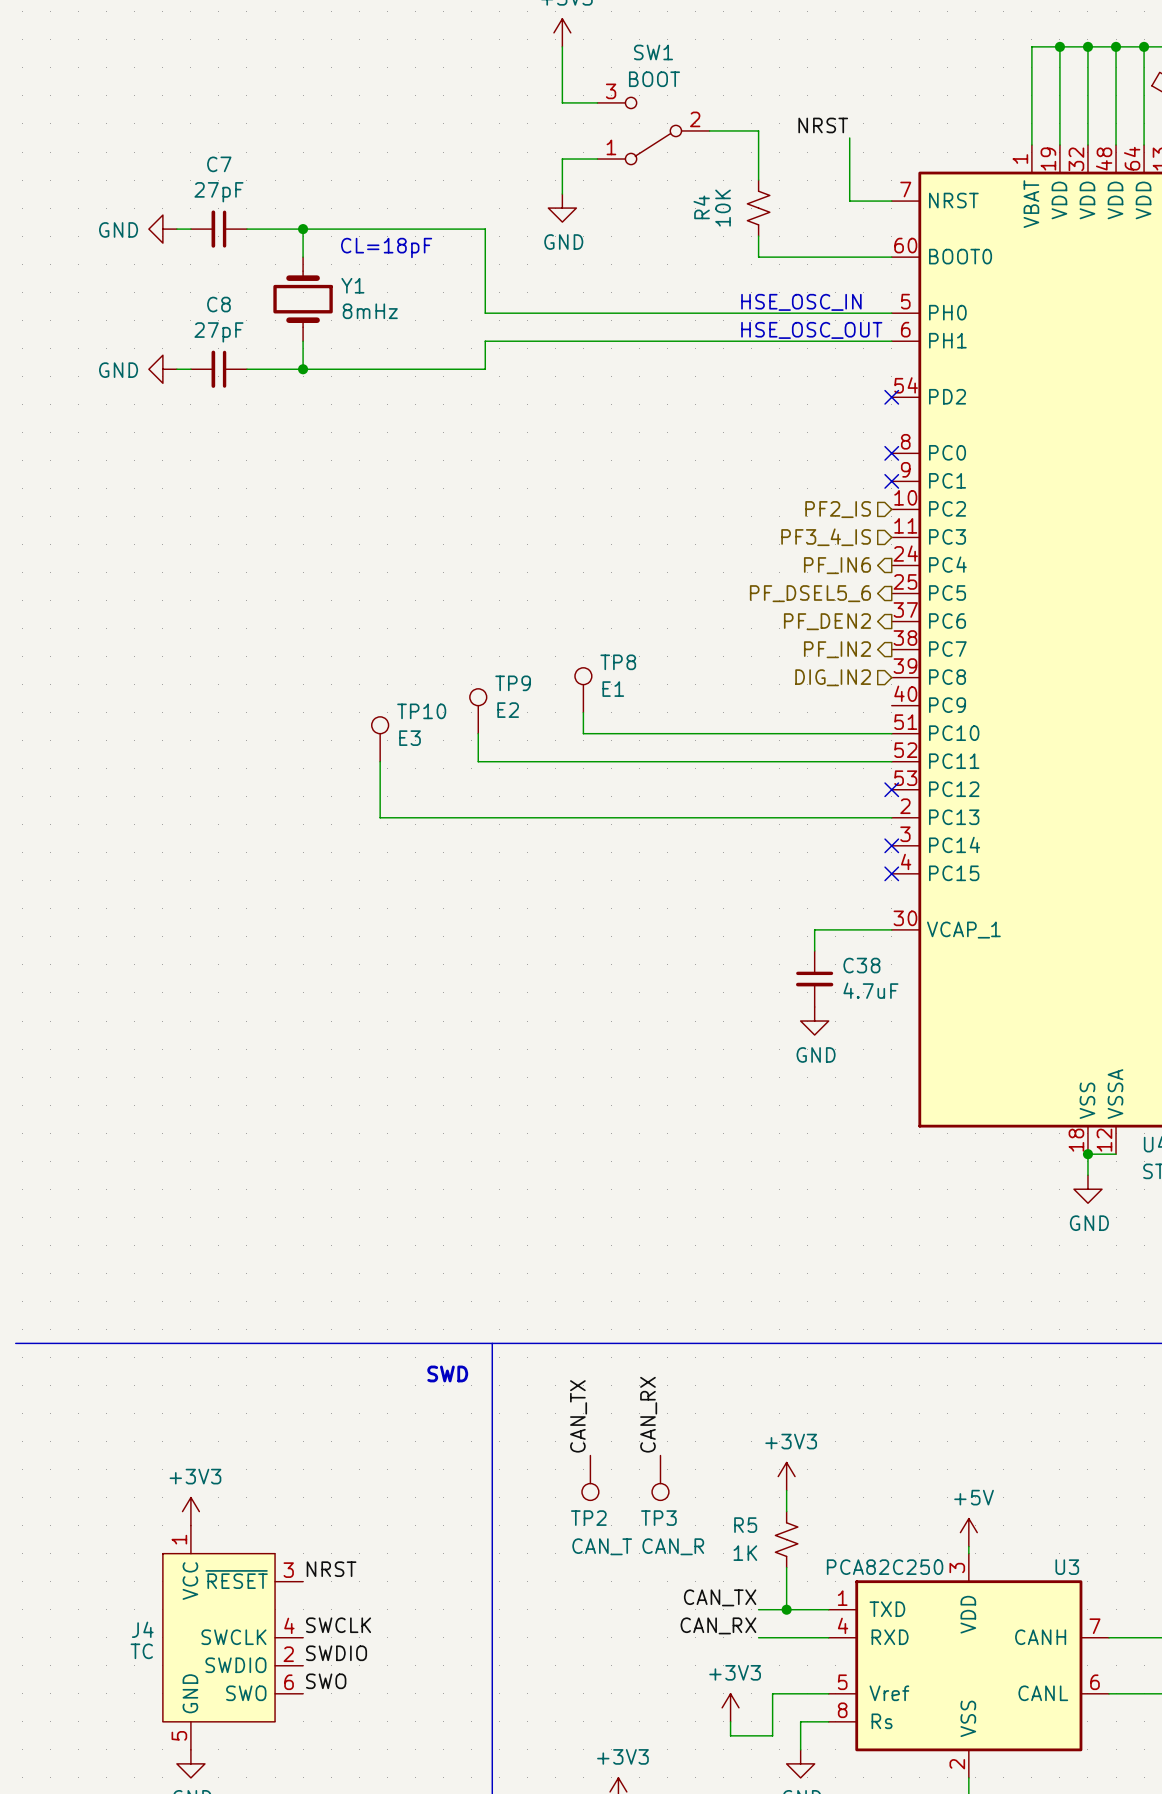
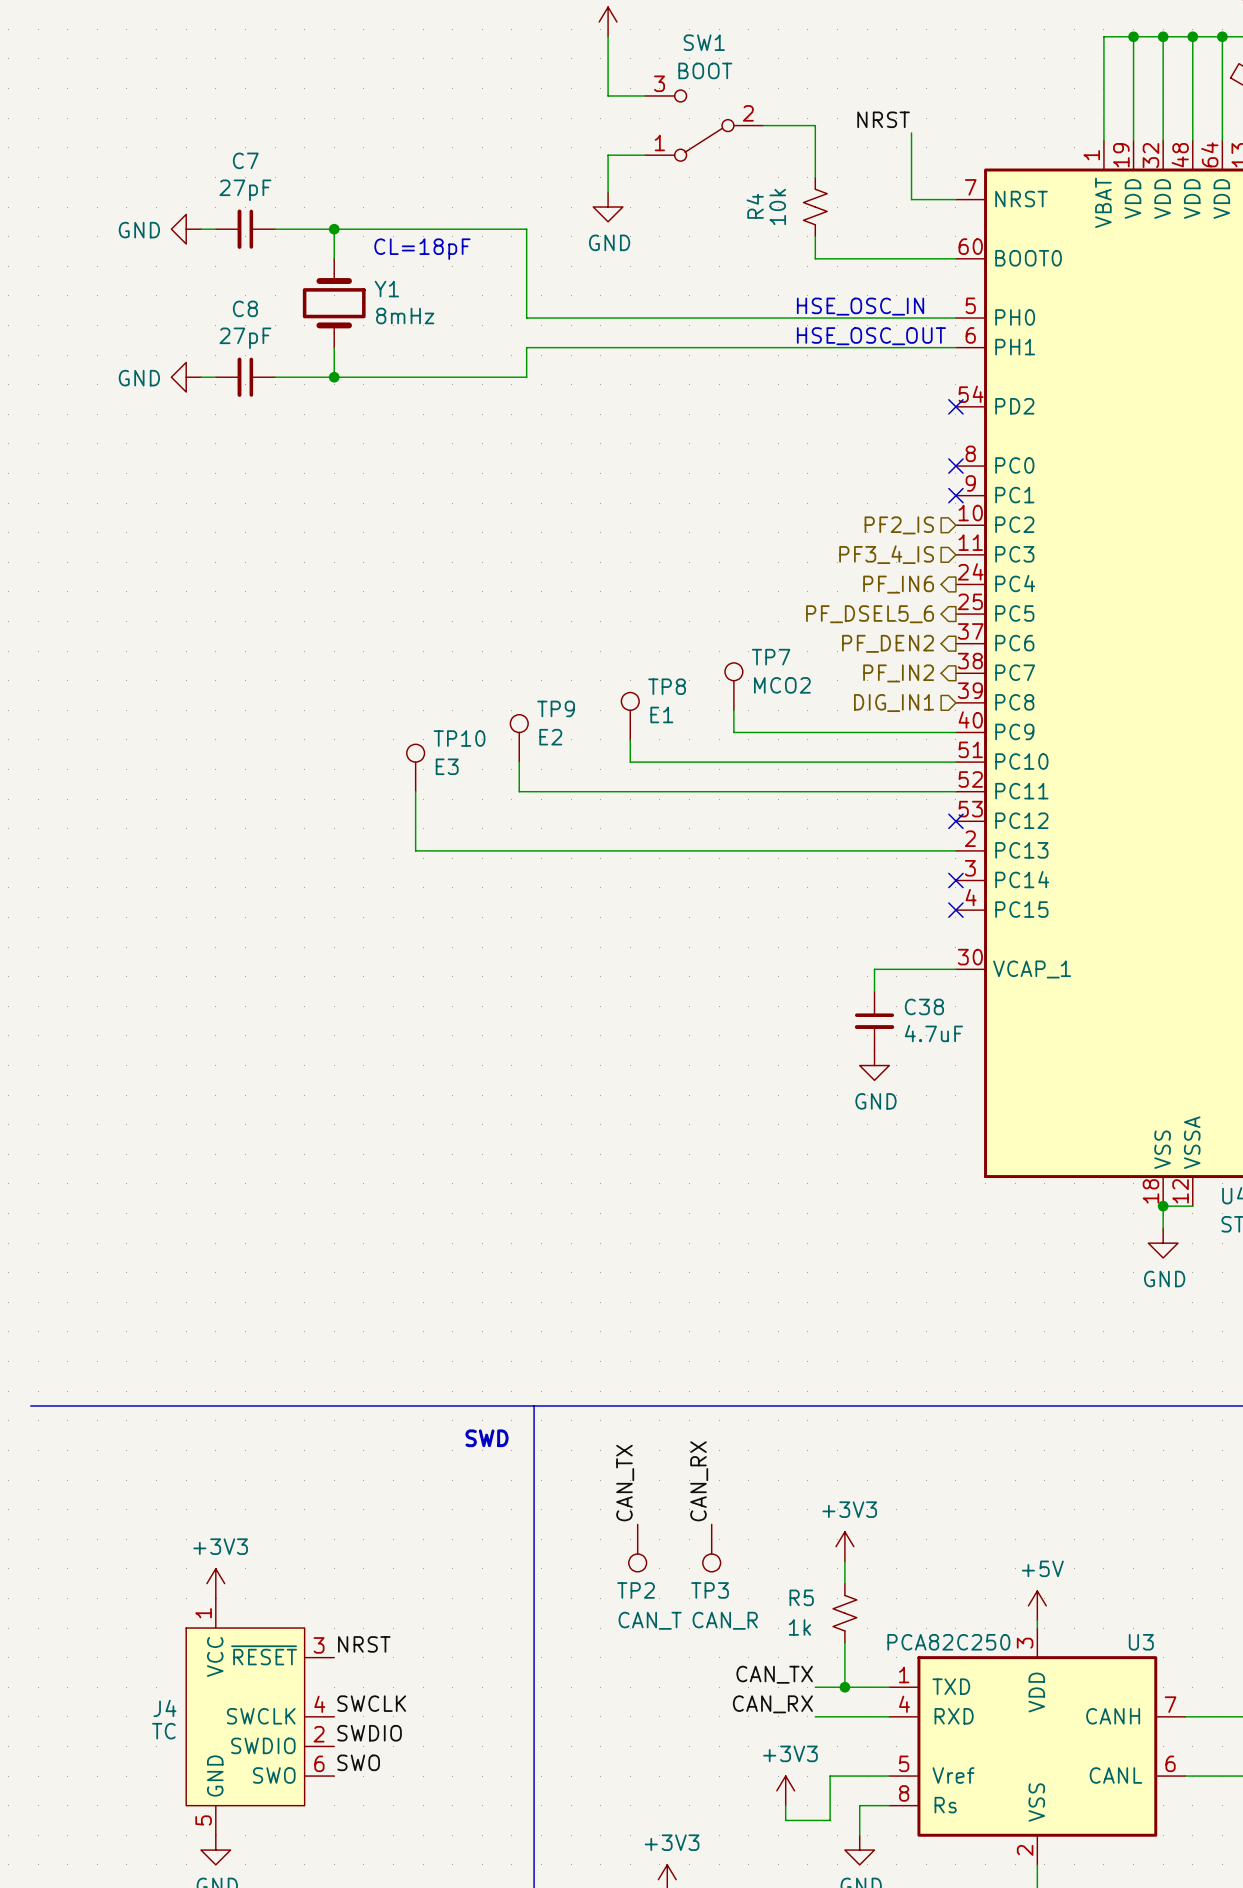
R4 value: 10K (723, 208) -> 10k (777, 207)
TP7: none -> MCO2 (733, 686)
hierarchical label: DIG_IN2 (833, 677) -> DIG_IN1 (894, 703)
wire: none -> (733, 710) (733, 732) (955, 732)
R5 value: 1K (745, 1553) -> 1k (799, 1627)

